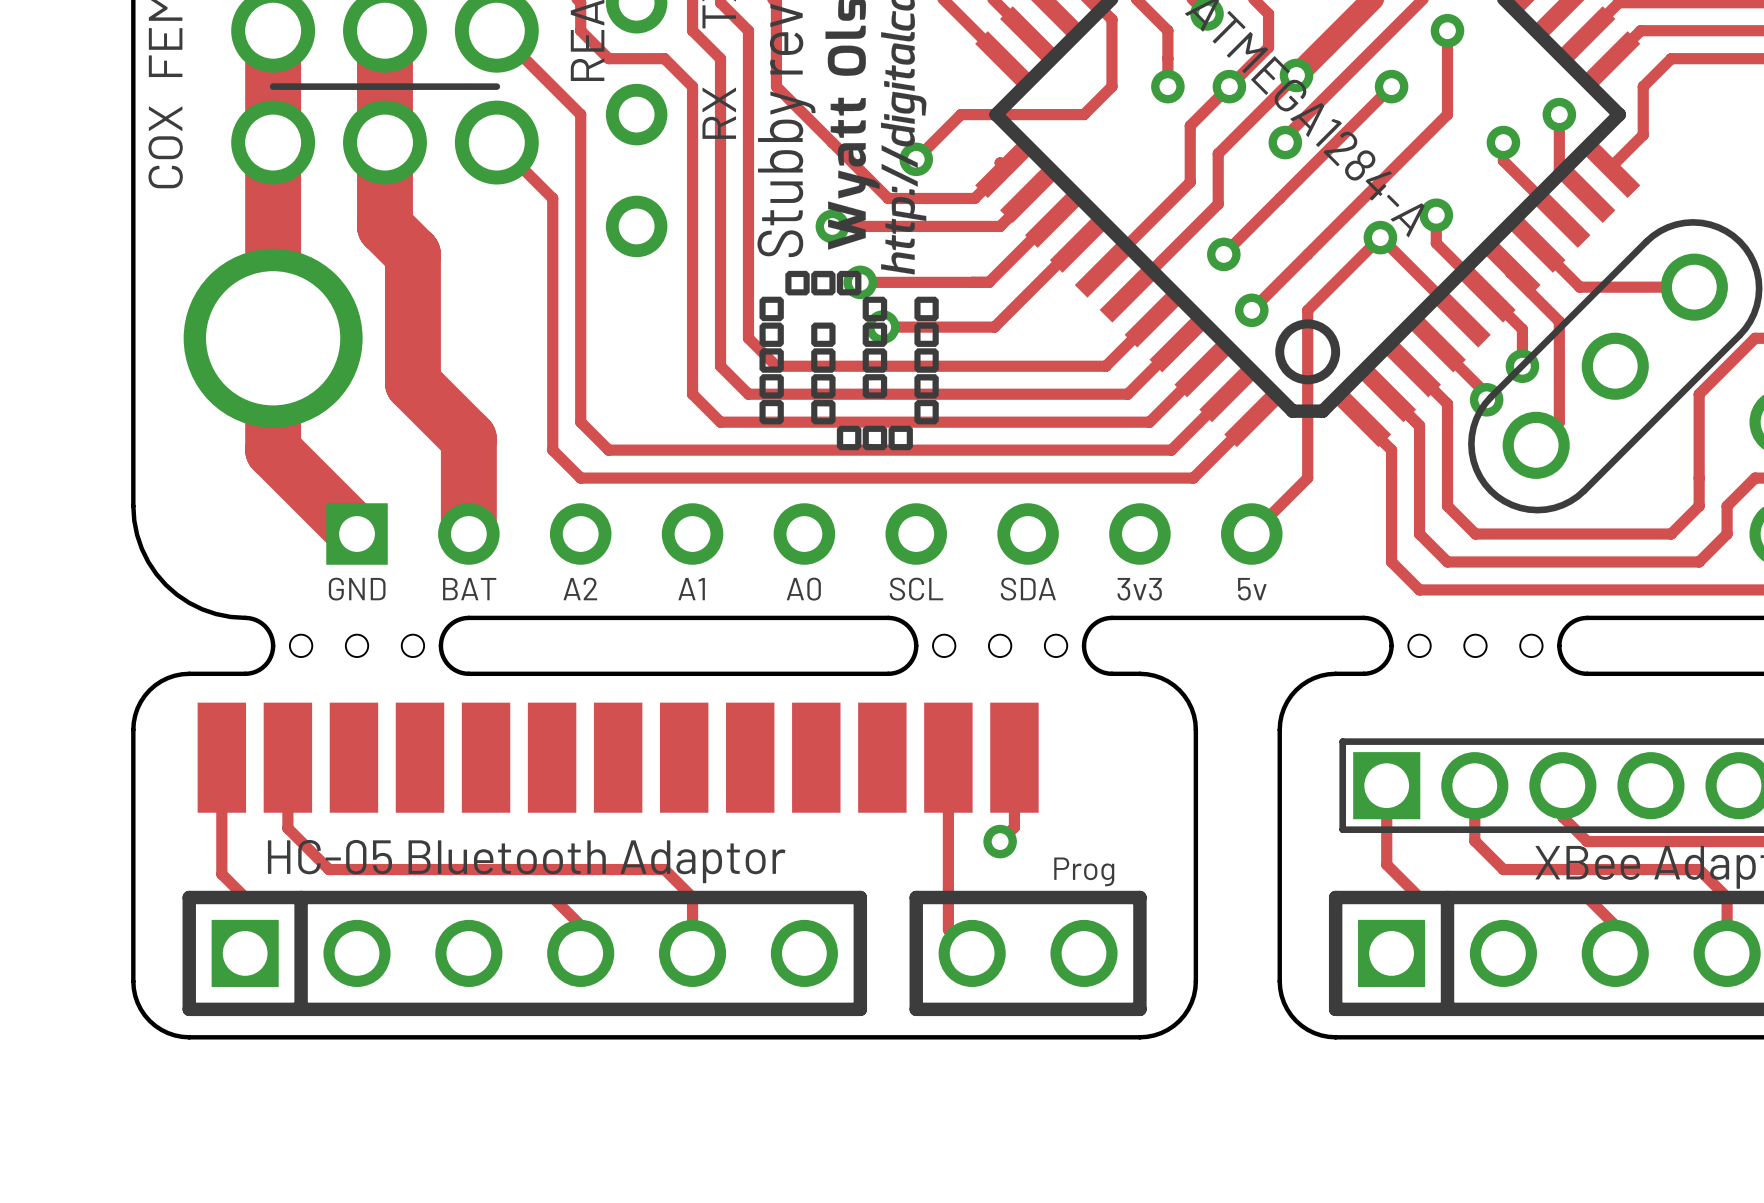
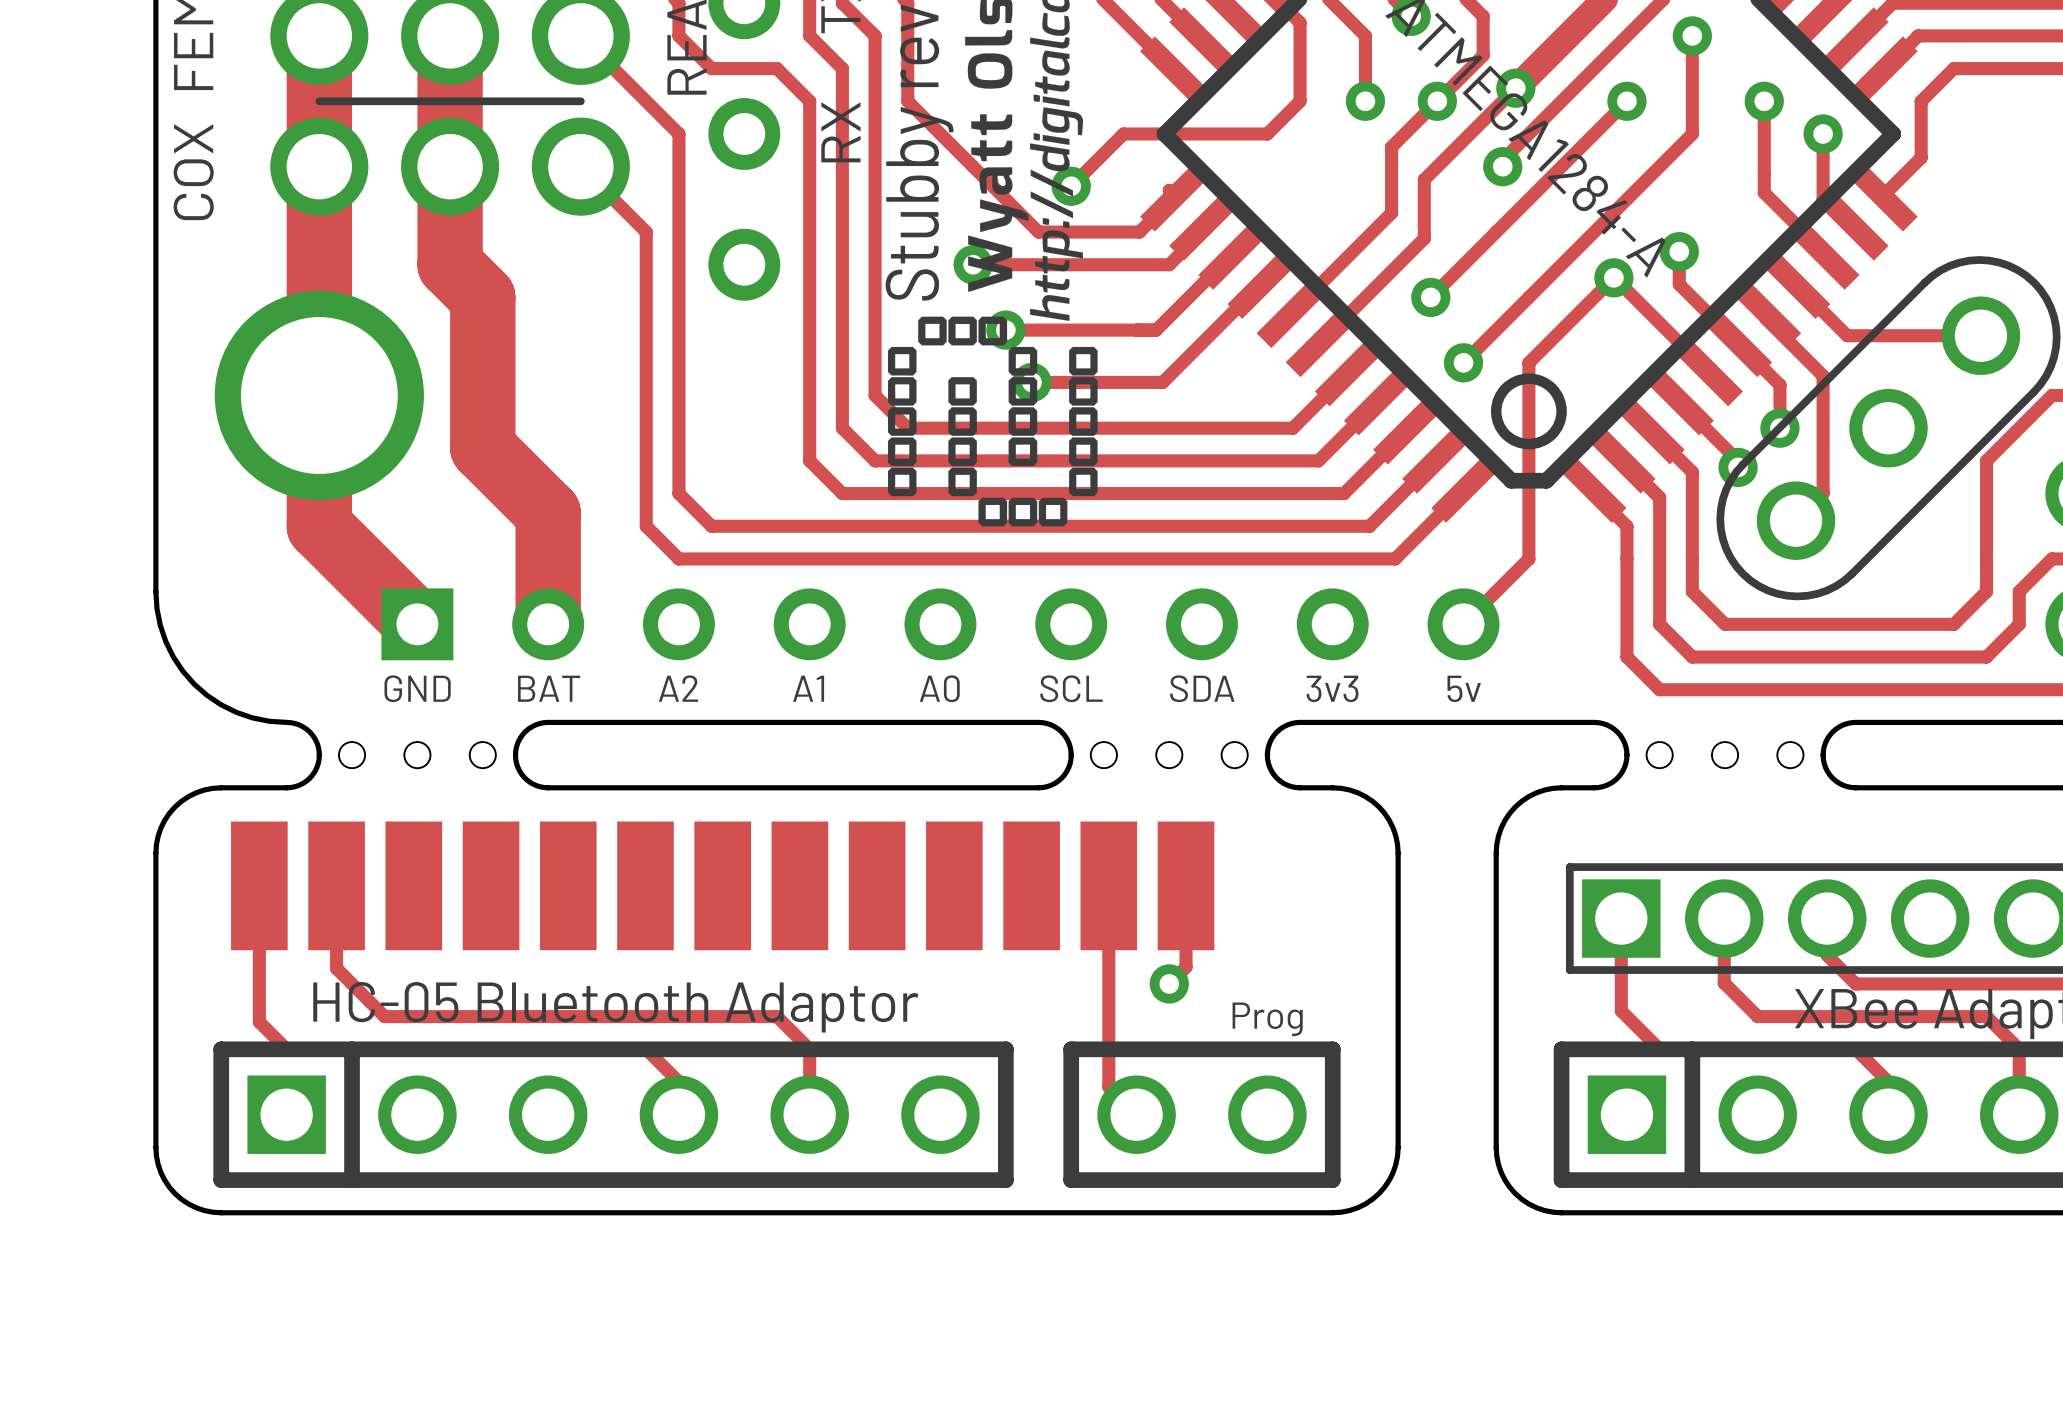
track: (1503, 142) (1503, 160) (1560, 217) -> (1764, 101) (1764, 192) (1824, 254)
via position: (1503, 142) -> (1764, 101)

